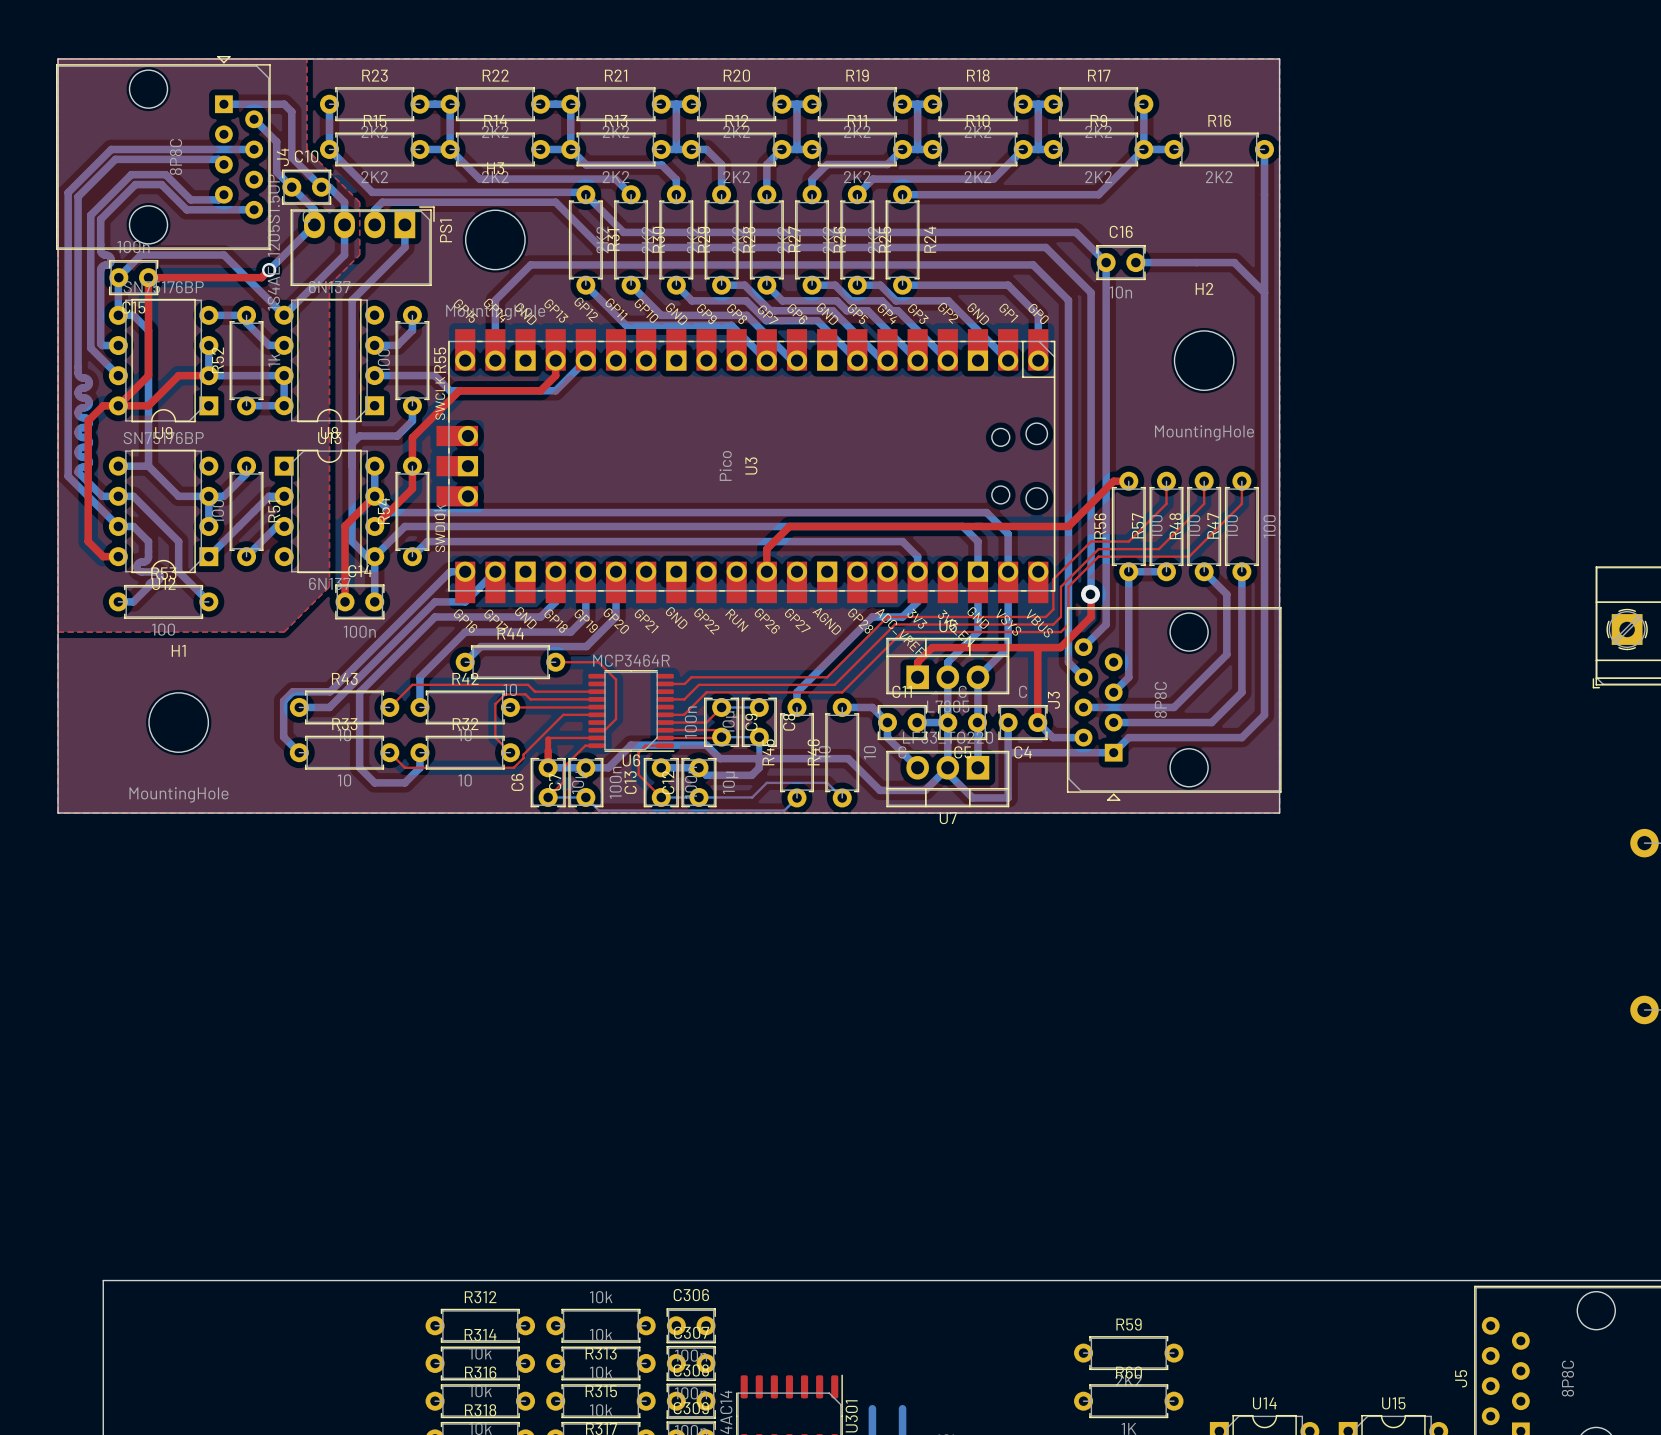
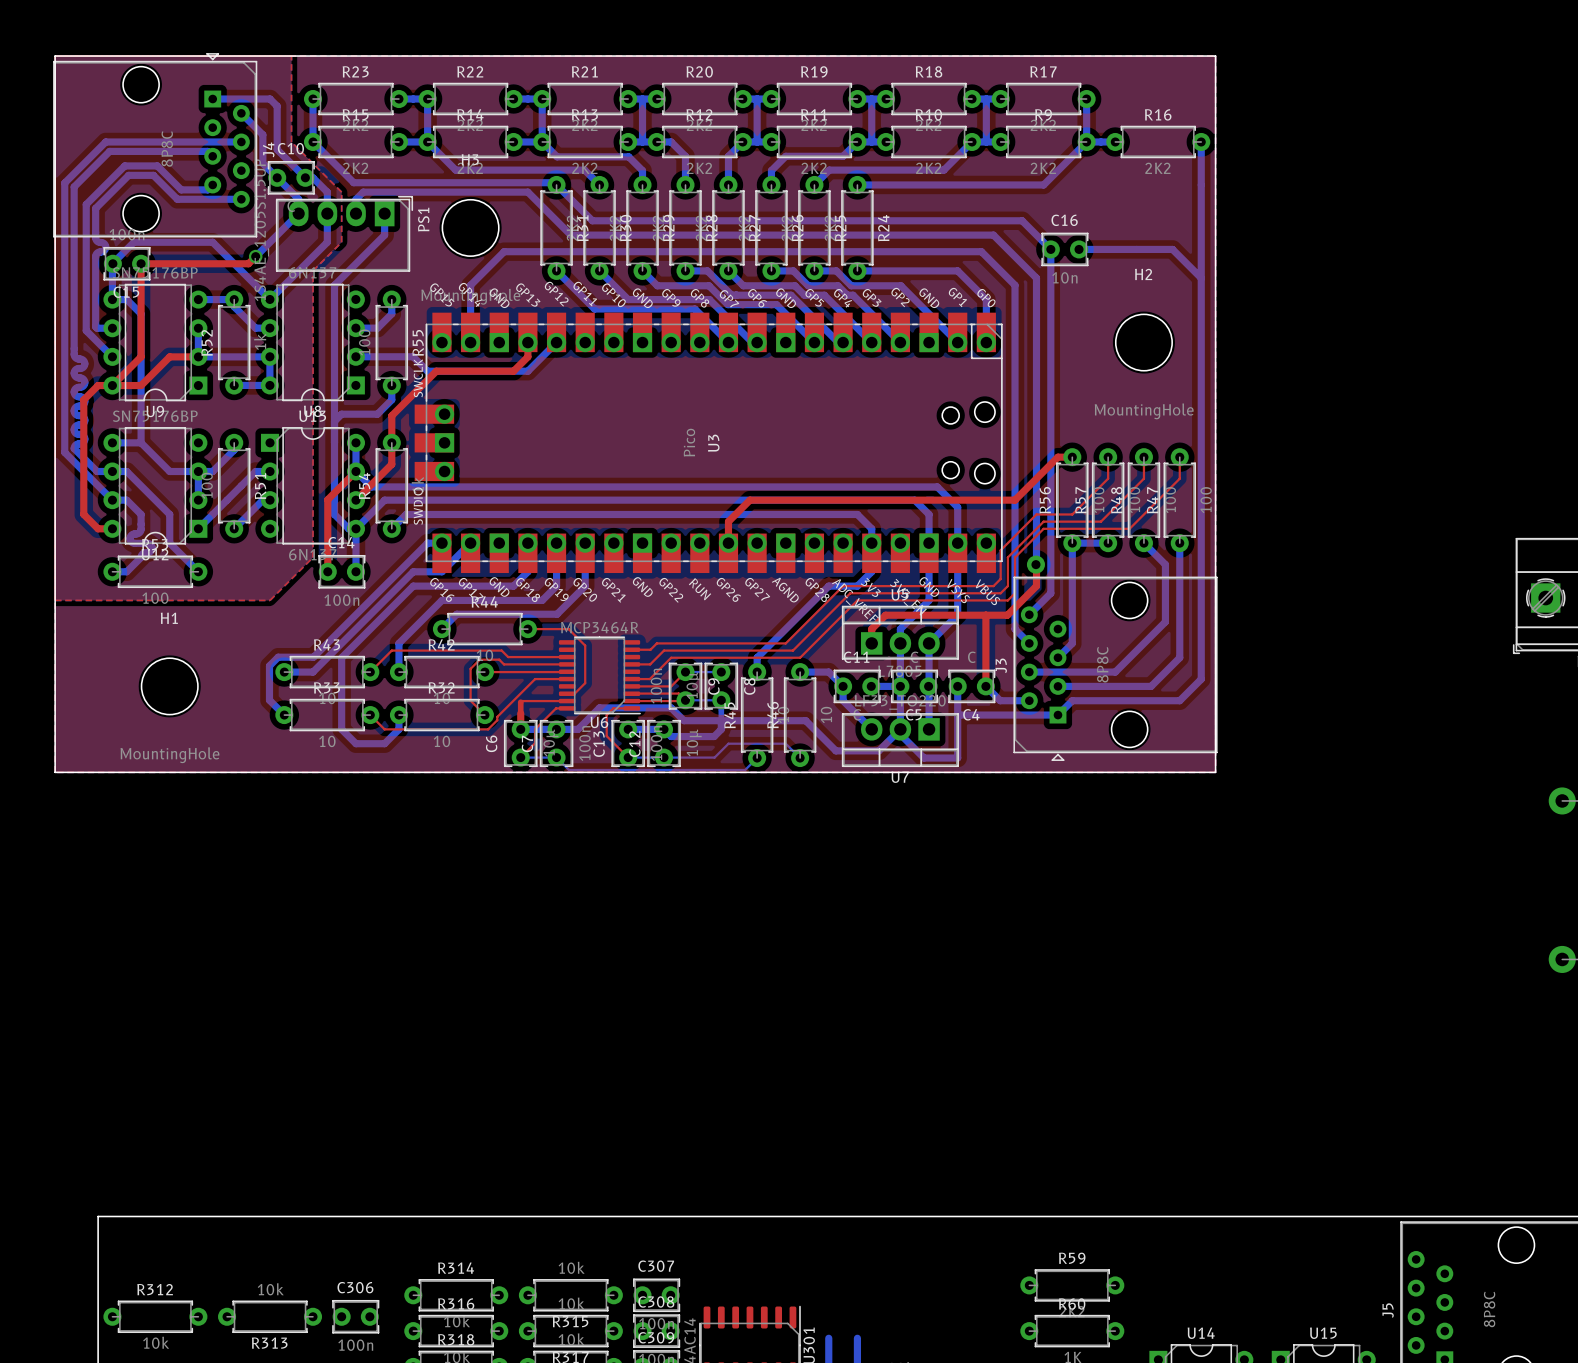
R312 position: (480, 1325) -> (155, 1316)
R313 position: (600, 1325) -> (270, 1316)
C306 position: (691, 1325) -> (355, 1316)

